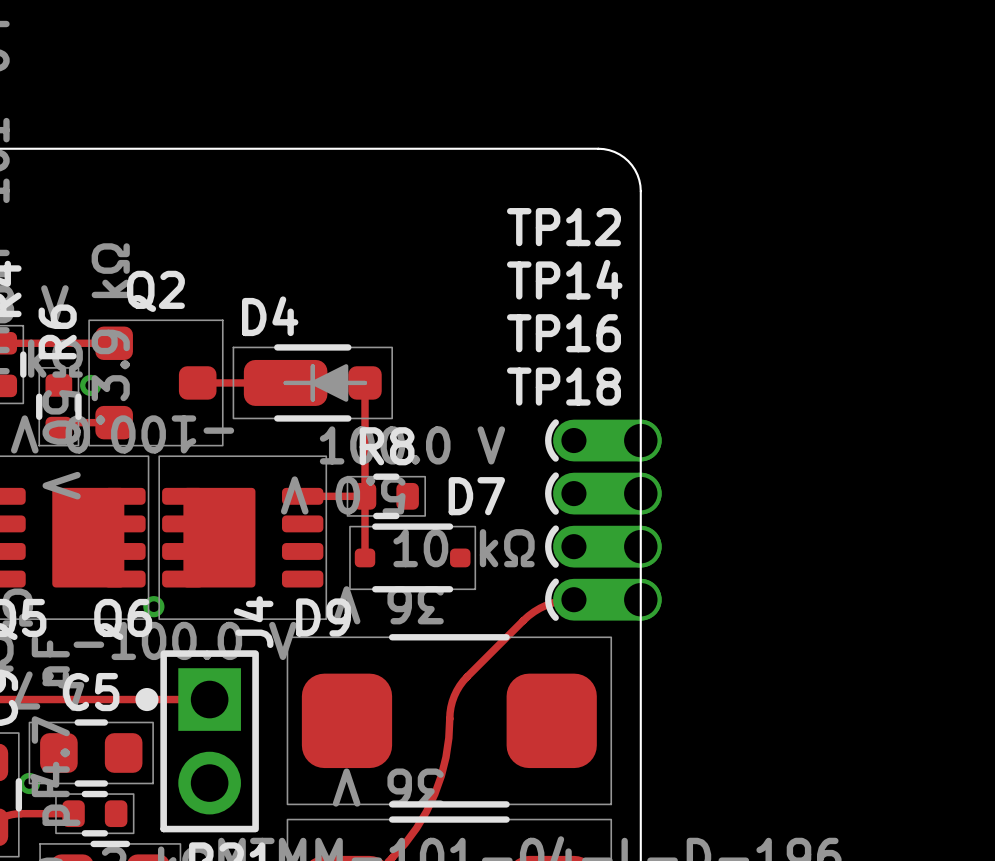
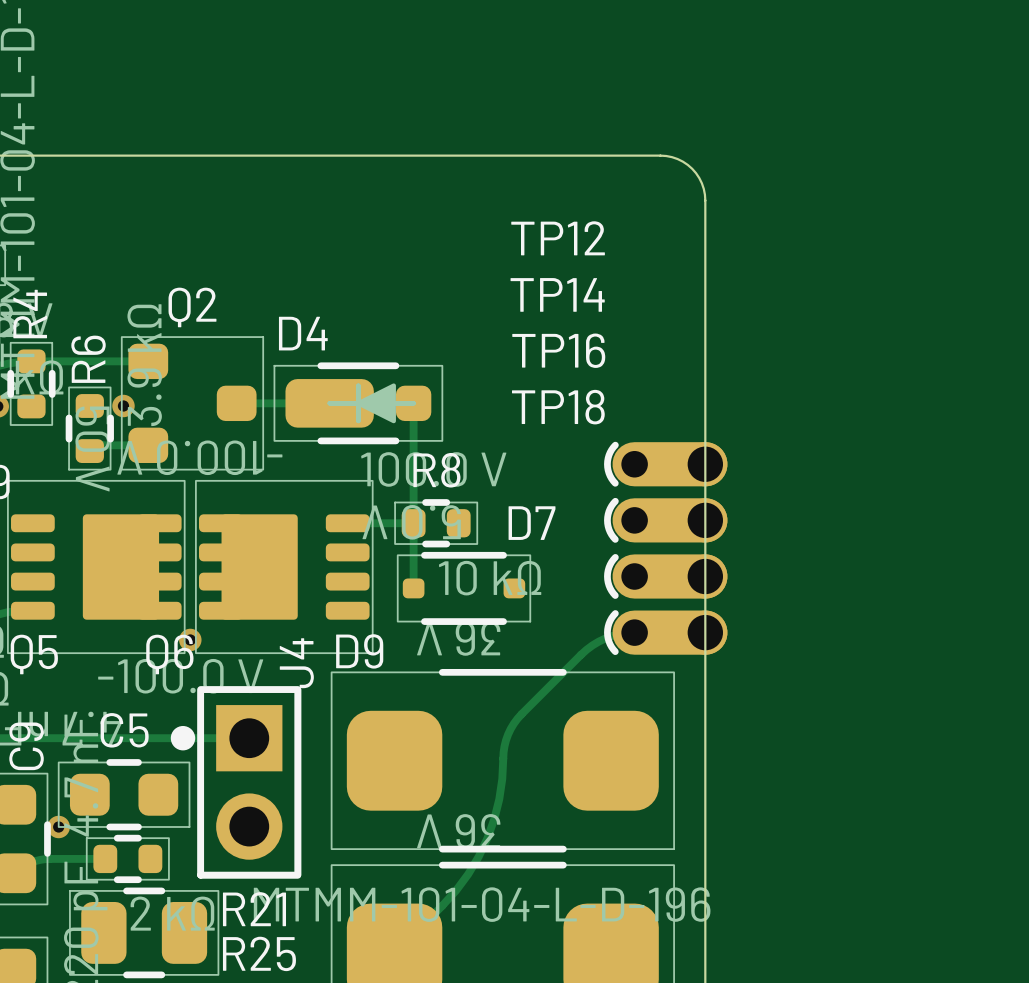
TP12 name position: TP12 (563, 227) -> TP12 (558, 238)
TP14 name position: TP14 (564, 279) -> TP14 (557, 294)
TP16 name position: TP16 (563, 333) -> TP16 (558, 350)
TP18 name position: TP18 (563, 386) -> TP18 (558, 407)

